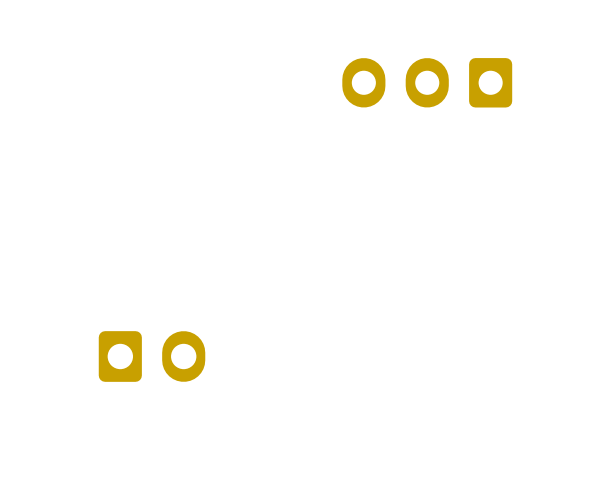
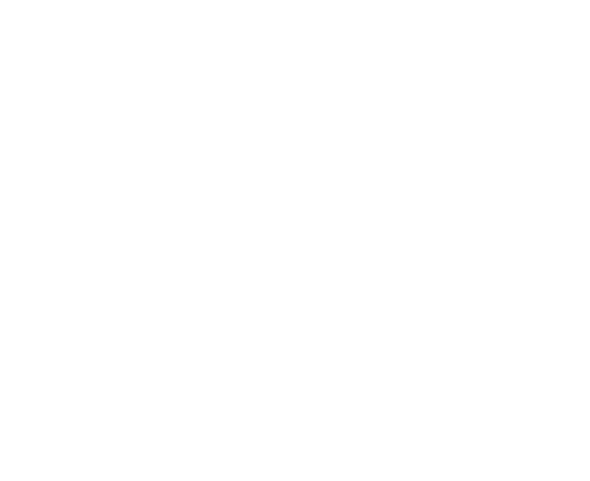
part: (427, 82) -> none
part: (152, 356) -> none

